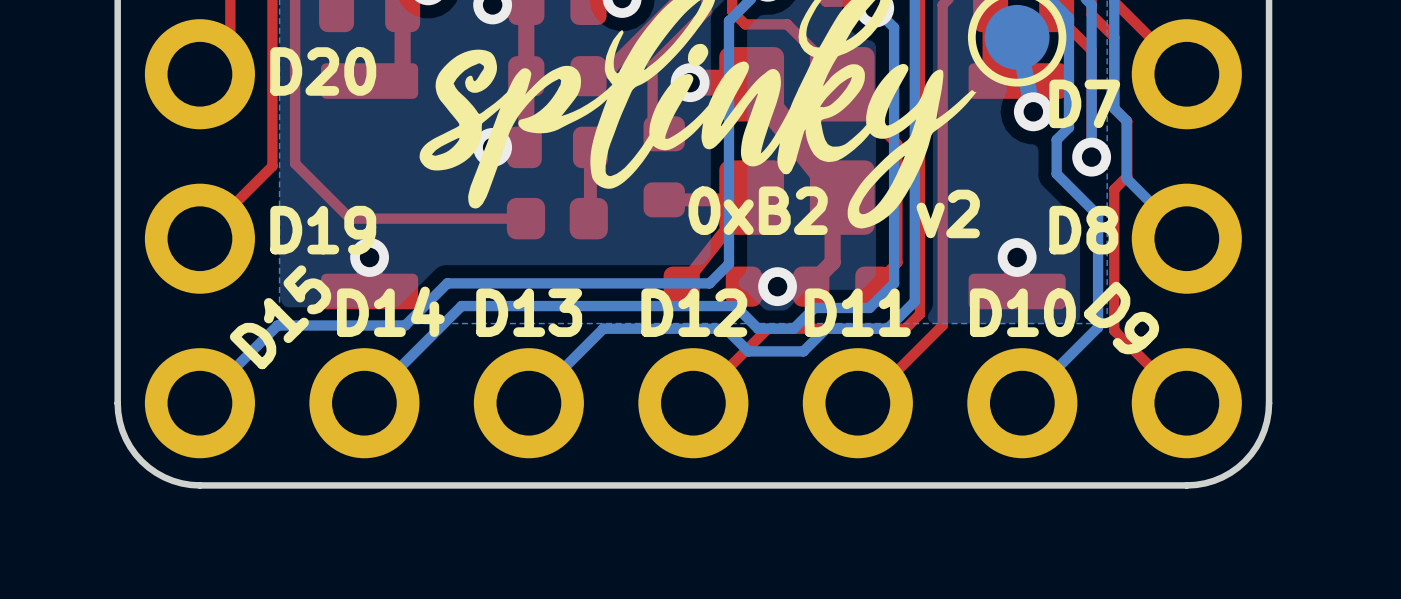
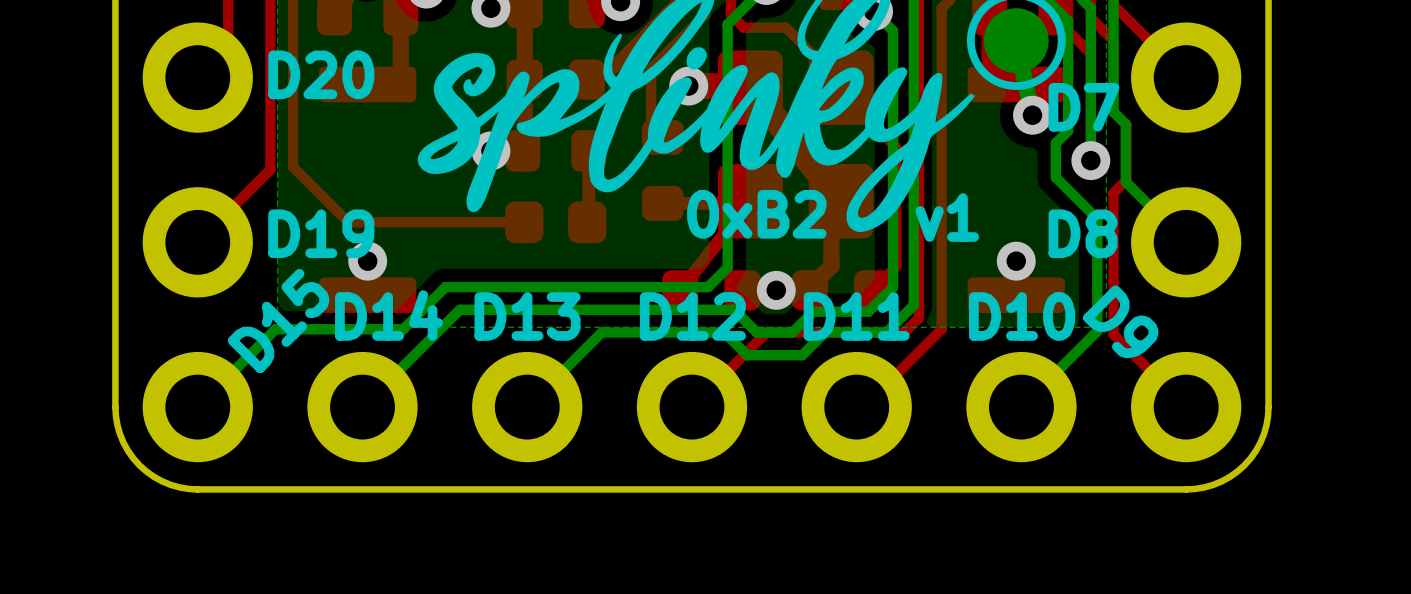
text: v2 (948, 213) -> v1 (947, 217)

